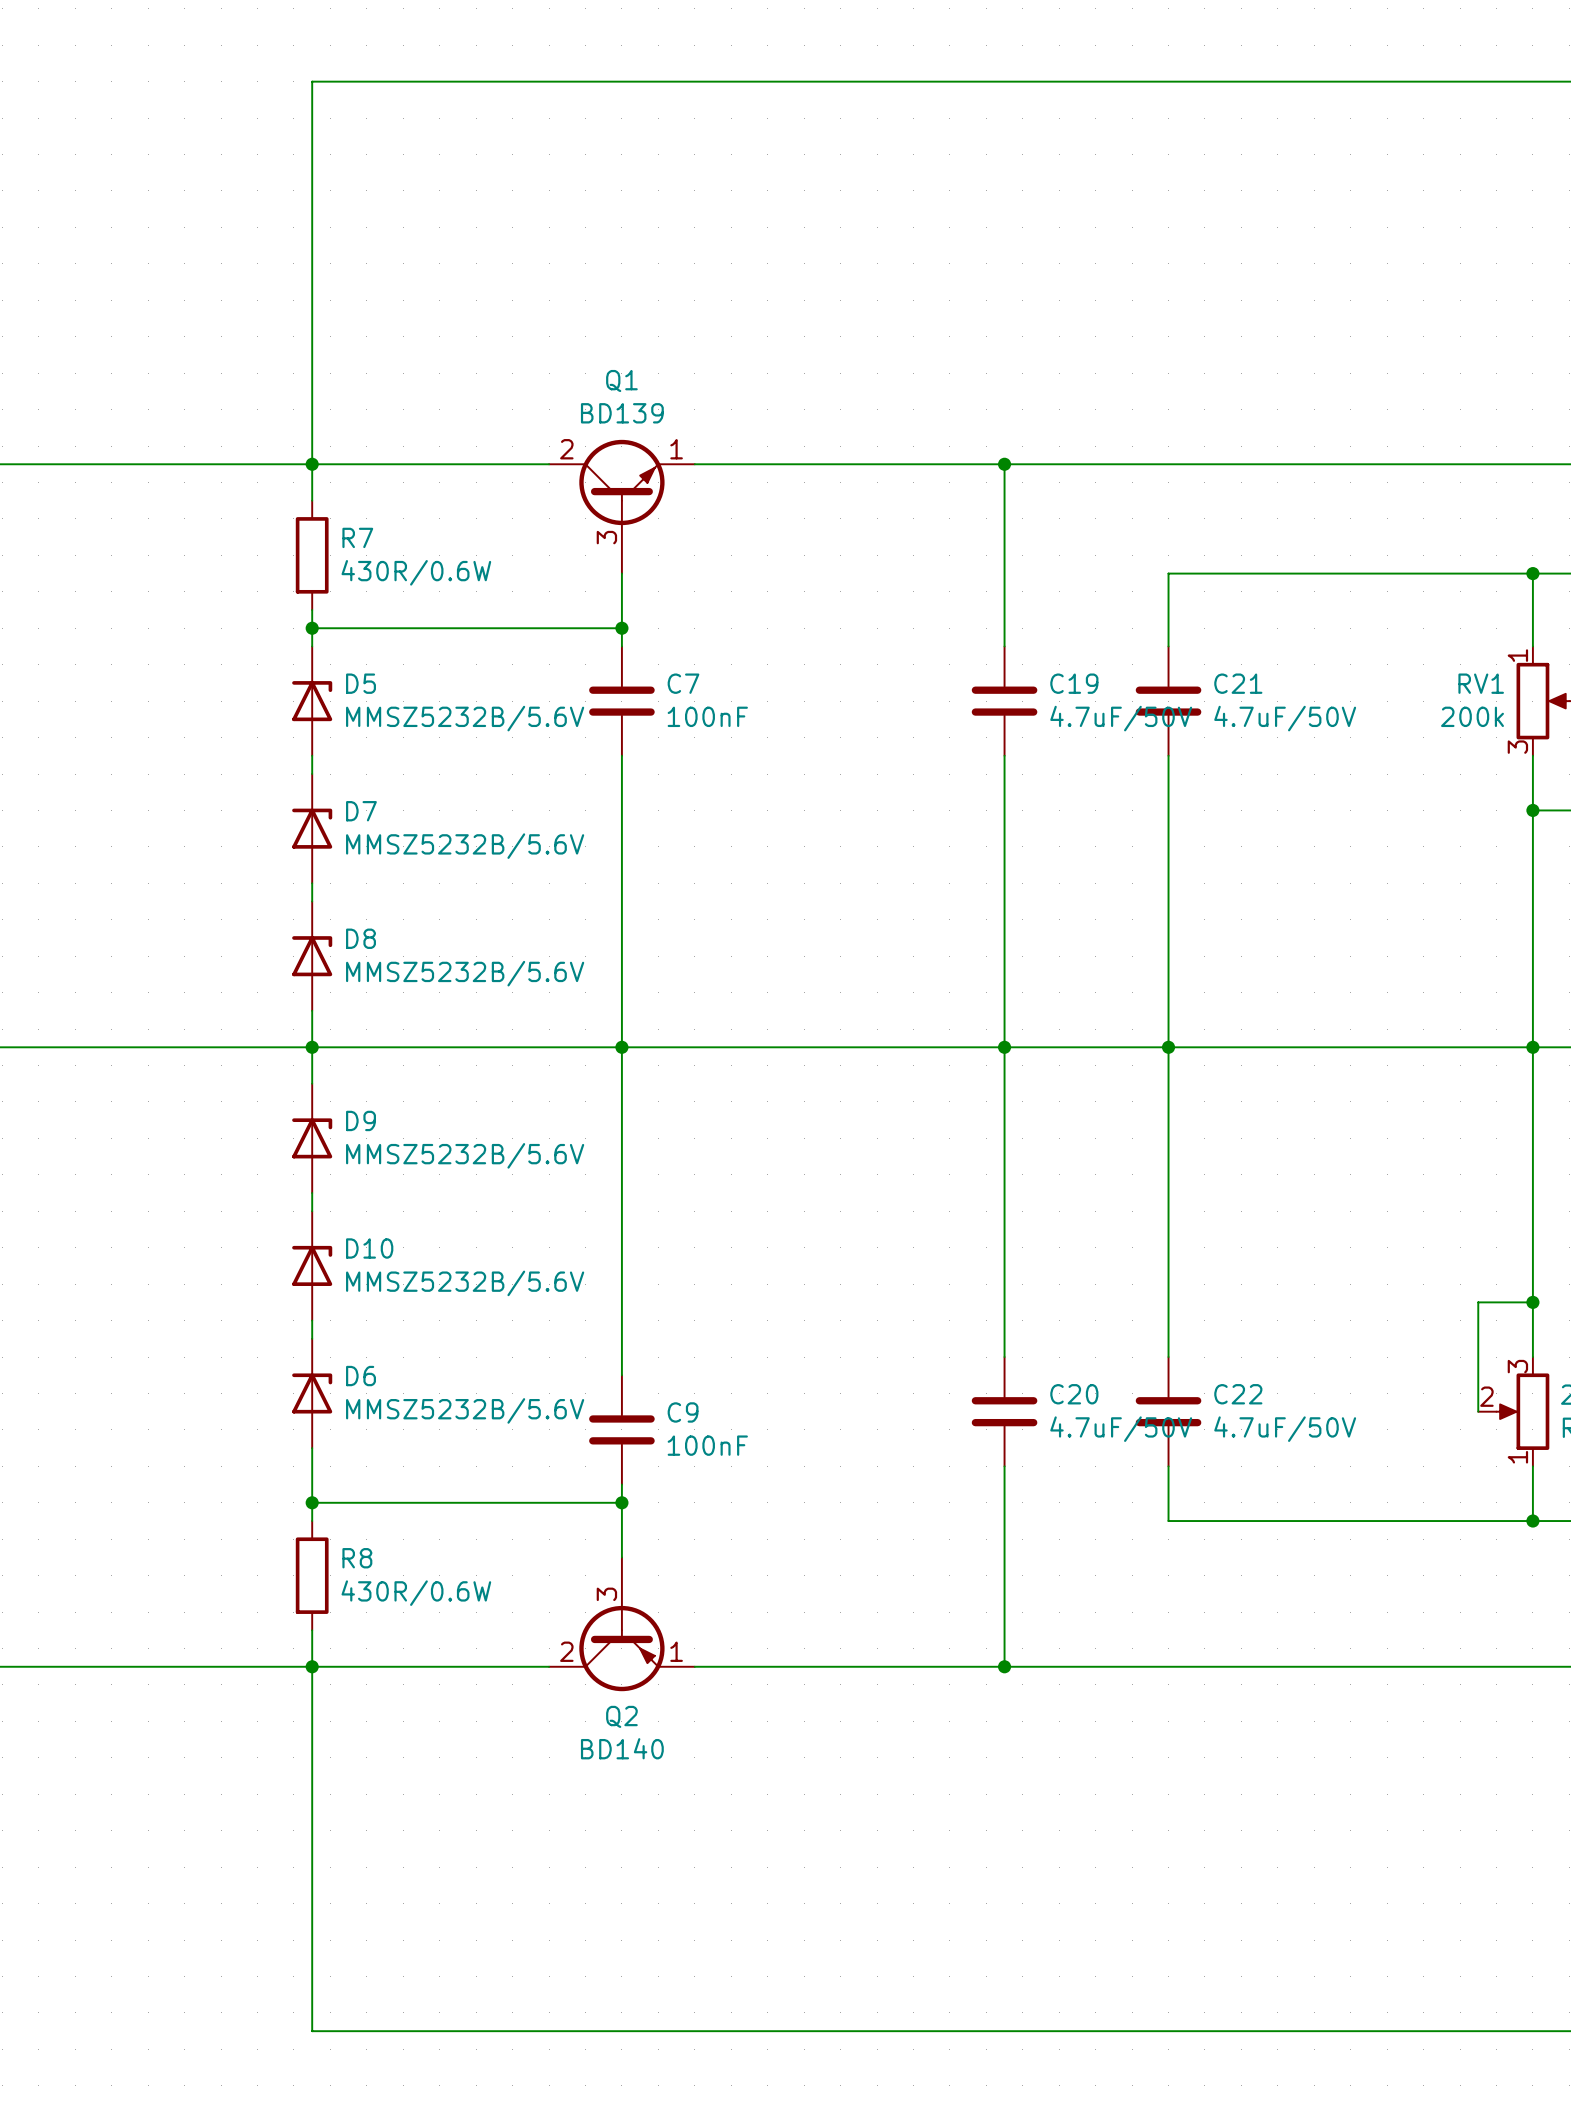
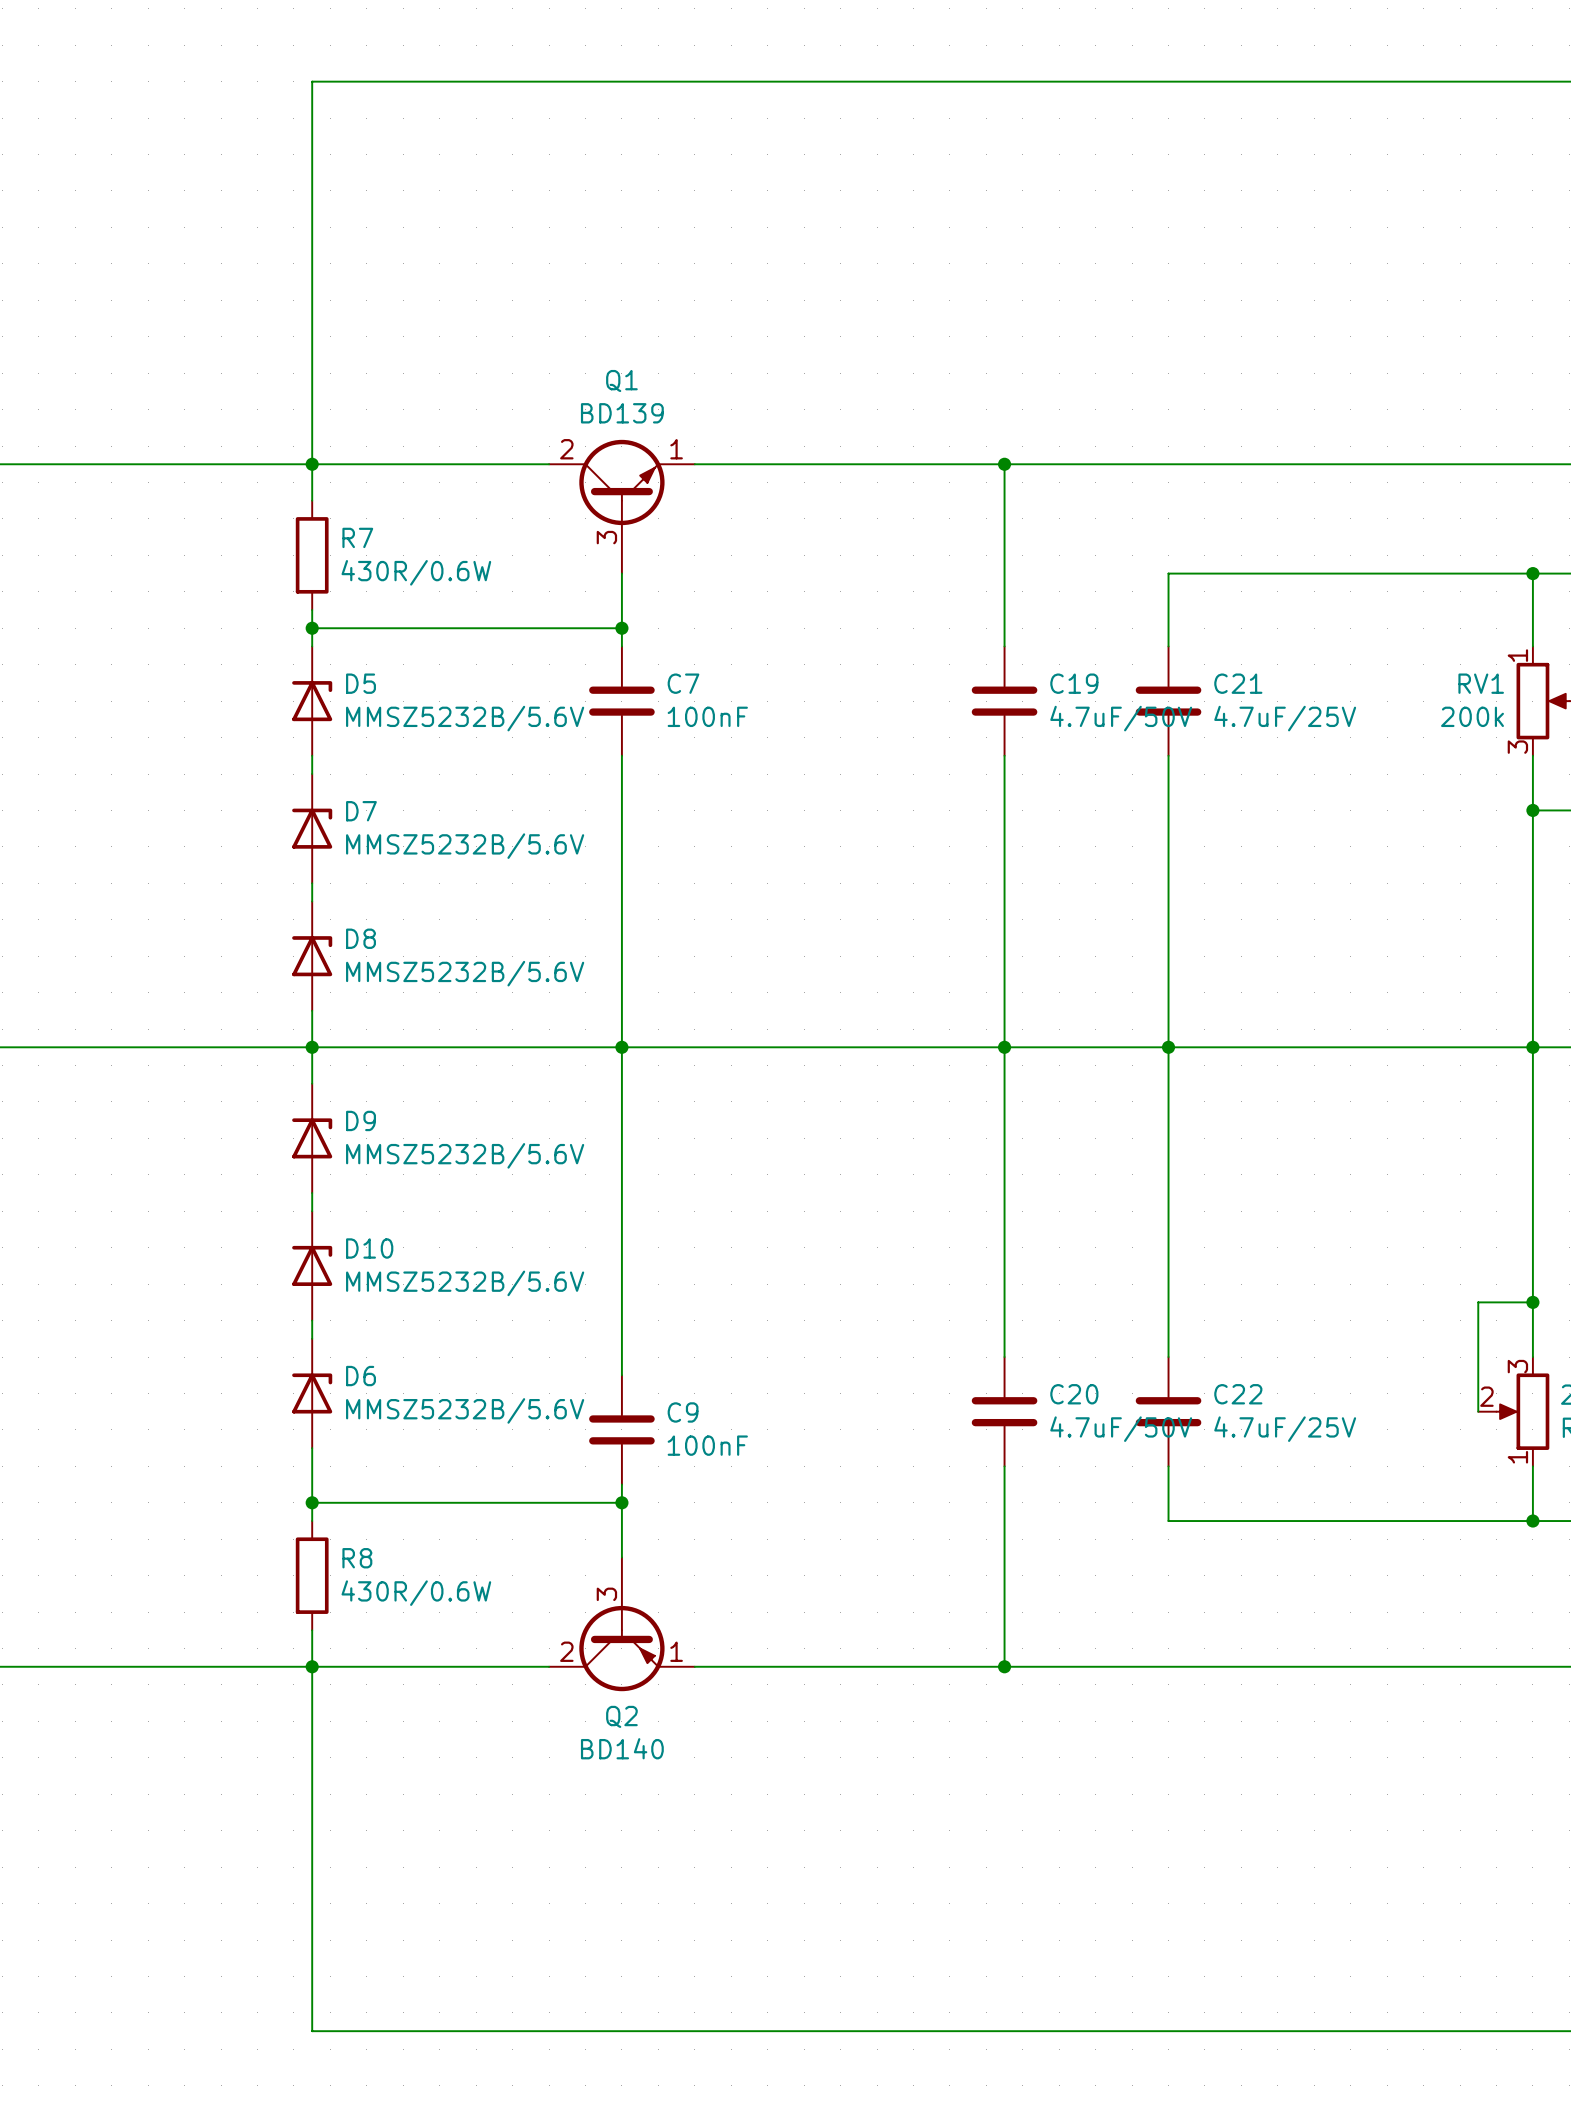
C21 value: 4.7uF/50V (1285, 718) -> 4.7uF/25V (1285, 718)
C22 value: 4.7uF/50V (1285, 1429) -> 4.7uF/25V (1285, 1429)

